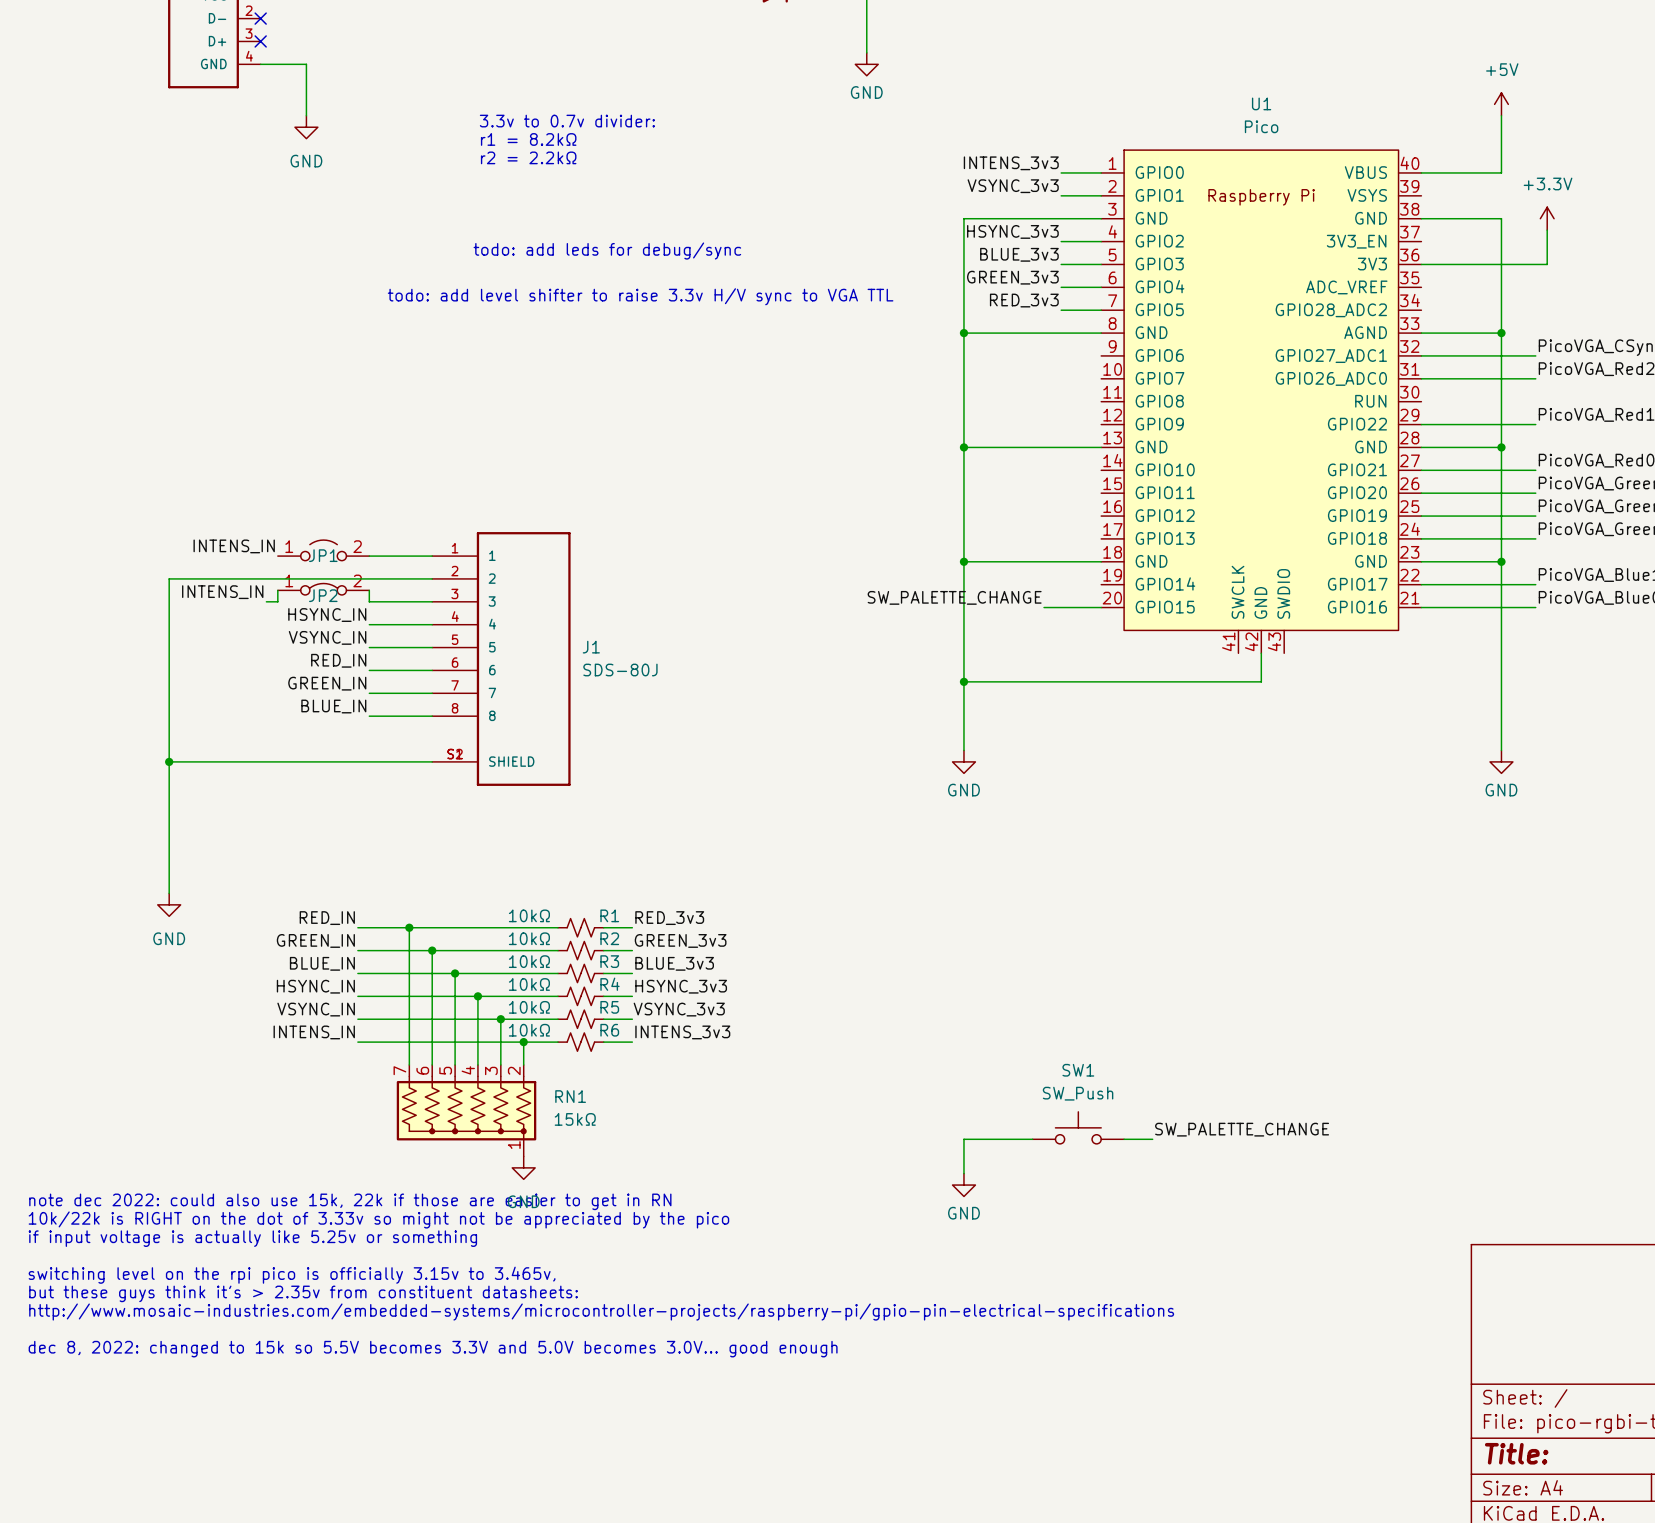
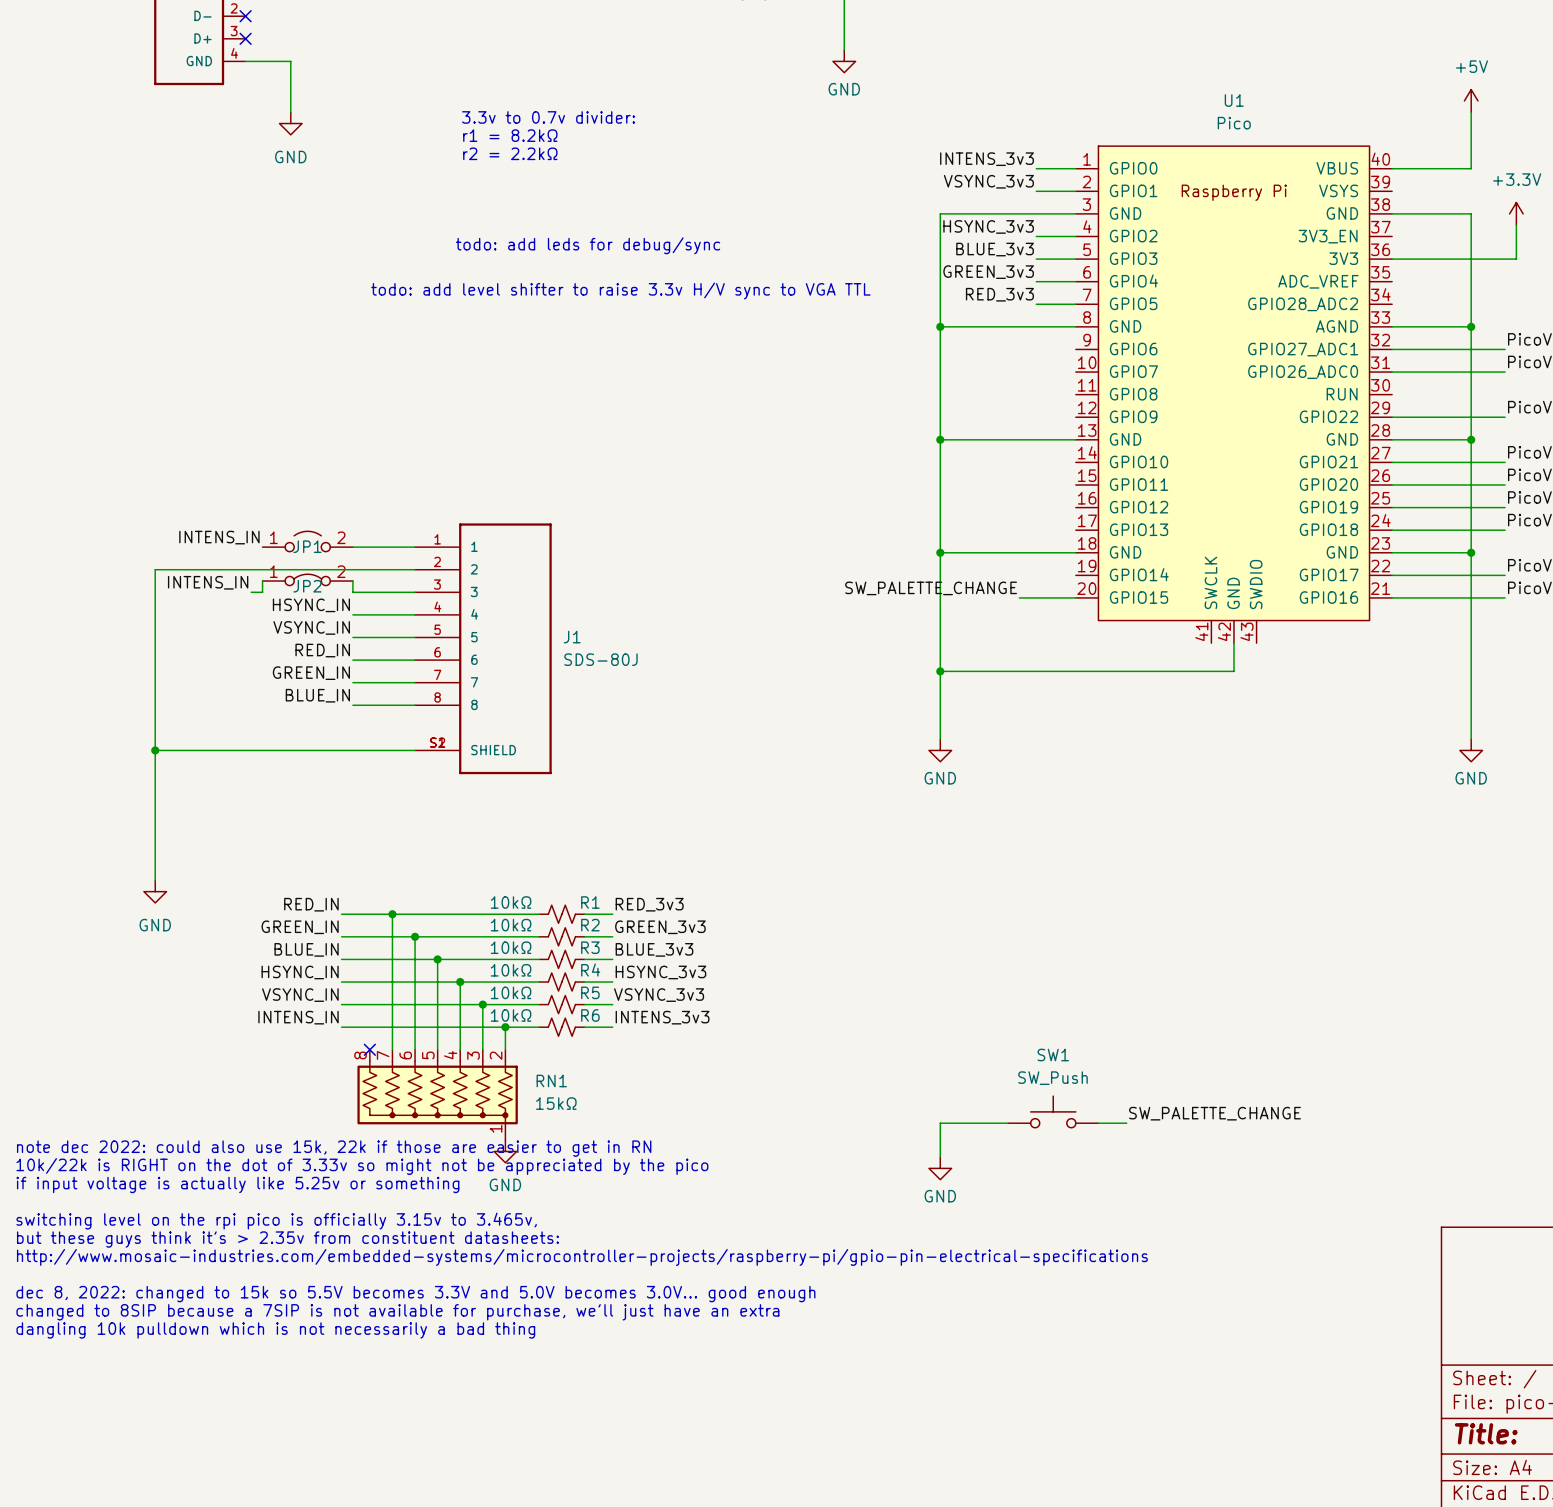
no-connect mark: none -> (369, 1049)
RN1 symbol: [396, 1064, 537, 1157] -> [357, 1049, 518, 1141]
text: none -> note dec 2022: could also use 15k, 22k if those are easier to get in RN (334, 1148)
text: note dec 2022: could also use 15k, 22k if those are easier to get in RN (350, 1201) -> if input voltage is actually like 5.25v or something (237, 1184)
text position: 10k/22k is RIGHT on the dot of 3.33v so might not be appreciated by the pico (378, 1219) -> 10k/22k is RIGHT on the dot of 3.33v so might not be appreciated by the pico (362, 1166)
text: if input voltage is actually like 5.25v or something (252, 1238) -> switching level on the rpi pico is officially 3.15v to 3.465v, (276, 1221)
text: switching level on the rpi pico is officially 3.15v to 3.465v, (292, 1275) -> http://www.mosaic-industries.com/embedded-systems/microcontroller-projects/raspberry-pi/gpio-pin-electrical-specifications (582, 1257)
text position: but these guys think it's > 2.35v from constituent datasheets: (303, 1293) -> but these guys think it's > 2.35v from constituent datasheets: (287, 1239)
text: http://www.mosaic-industries.com/embedded-systems/microcontroller-projects/raspberry-pi/gpio-pin-electrical-specifications (601, 1312) -> dec 8, 2022: changed to 15k so 5.5V becomes 3.3V and 5.0V becomes 3.0V... good enough (415, 1294)
text: none -> changed to 8SIP because a 7SIP is not available for purchase, we'll just have an extra (397, 1312)
text: dec 8, 2022: changed to 15k so 5.5V becomes 3.3V and 5.0V becomes 3.0V... good enough (433, 1349) -> dangling 10k pulldown which is not necessarily a bad thing (275, 1330)

